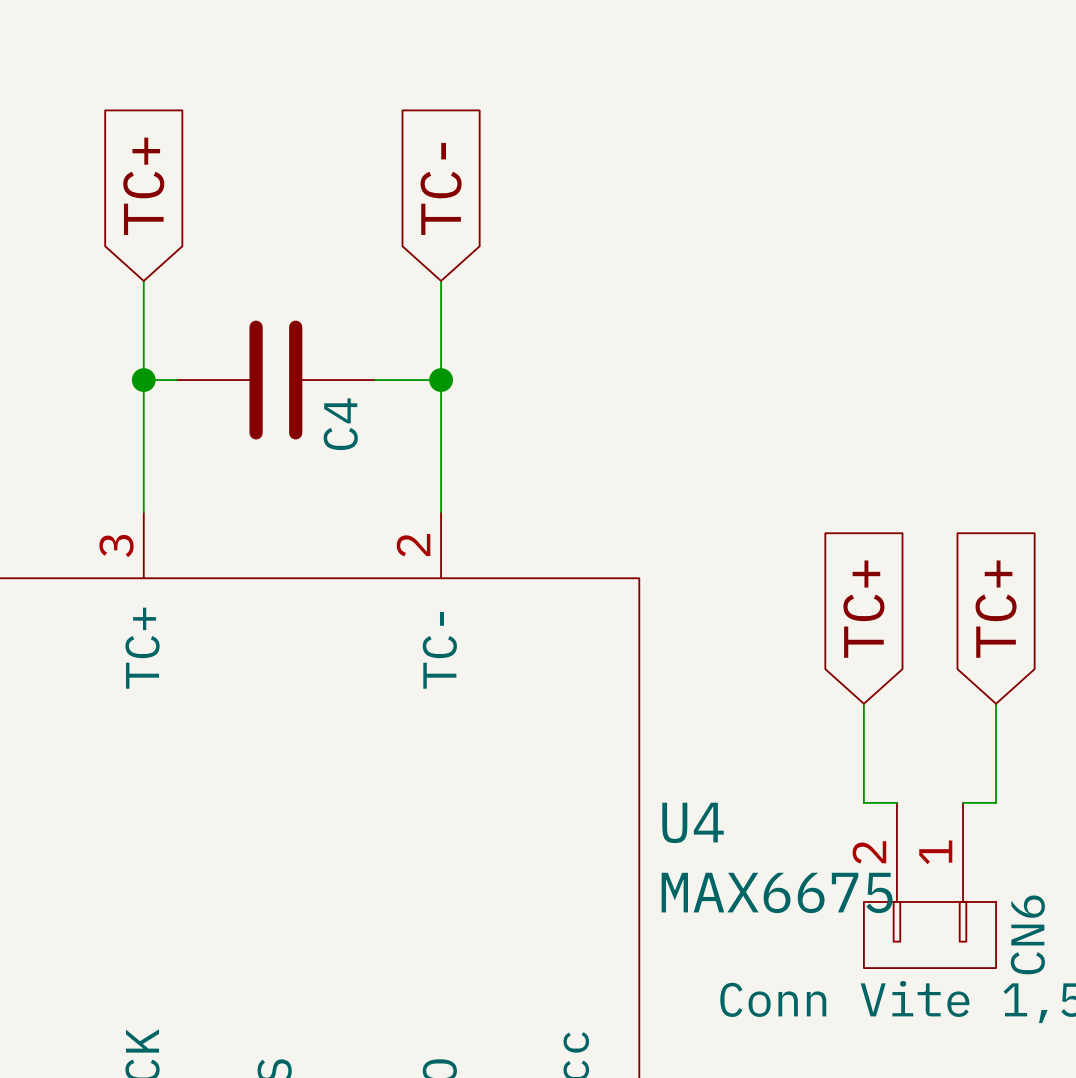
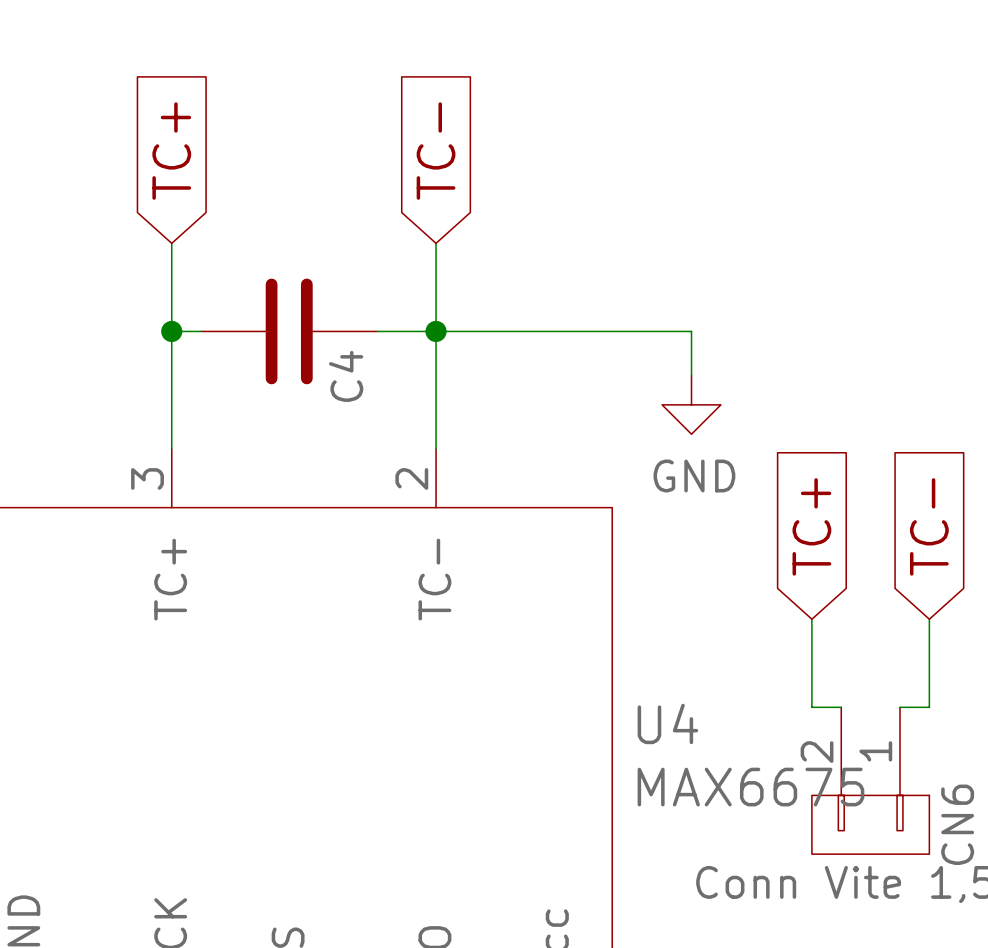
wire: none -> (436, 331) (691, 331) (691, 375)
power symbol: none -> GND (691, 404)
global label: TC+ (996, 609) -> TC- (929, 526)

